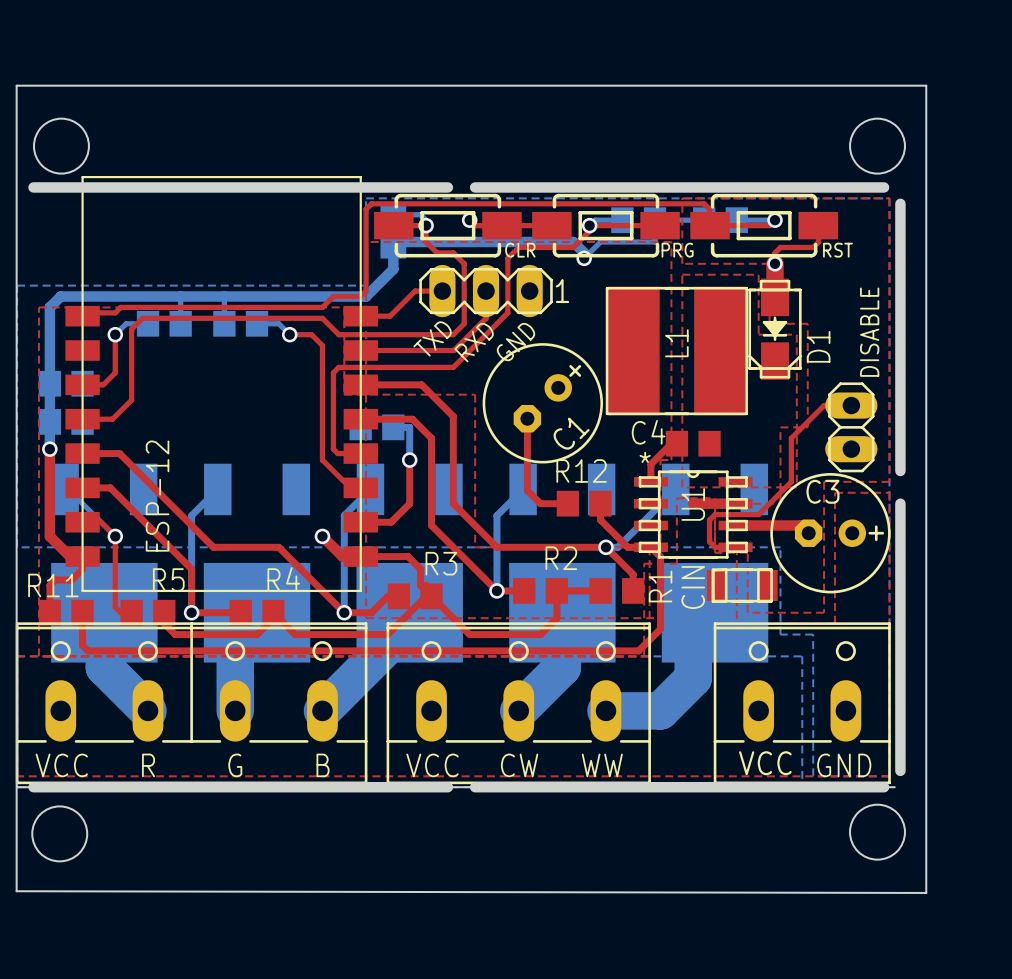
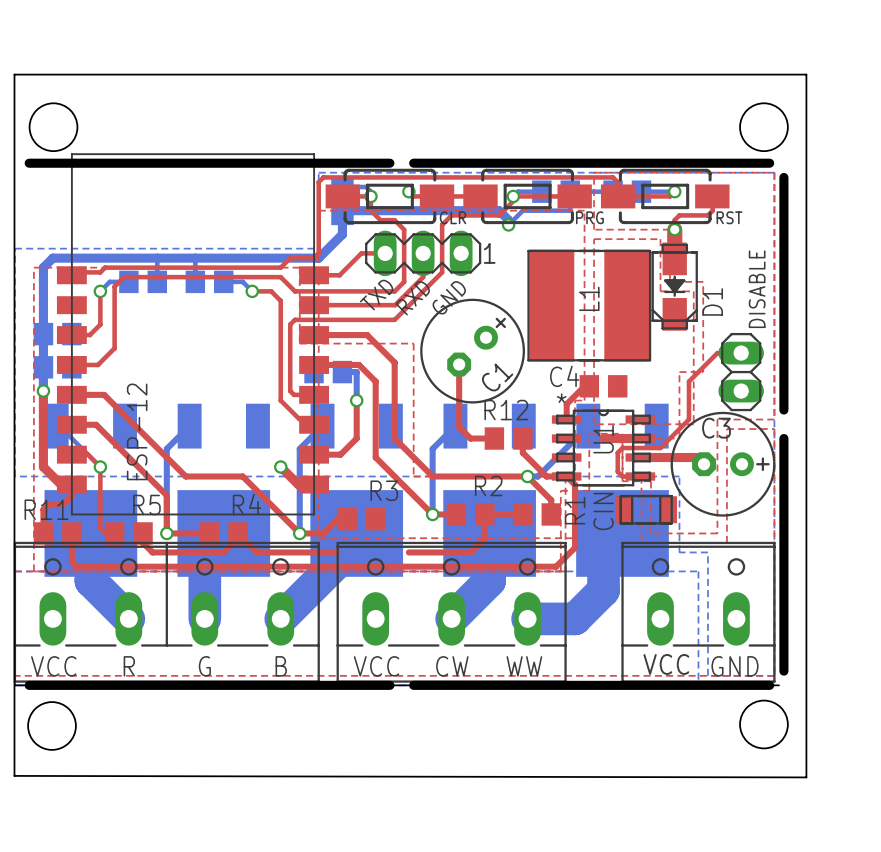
top track: (360, 556) (408, 556) (420, 569) (420, 585) (469, 634) -> none
top track: (426, 585) (431, 596) (426, 596) (387, 634) -> none

